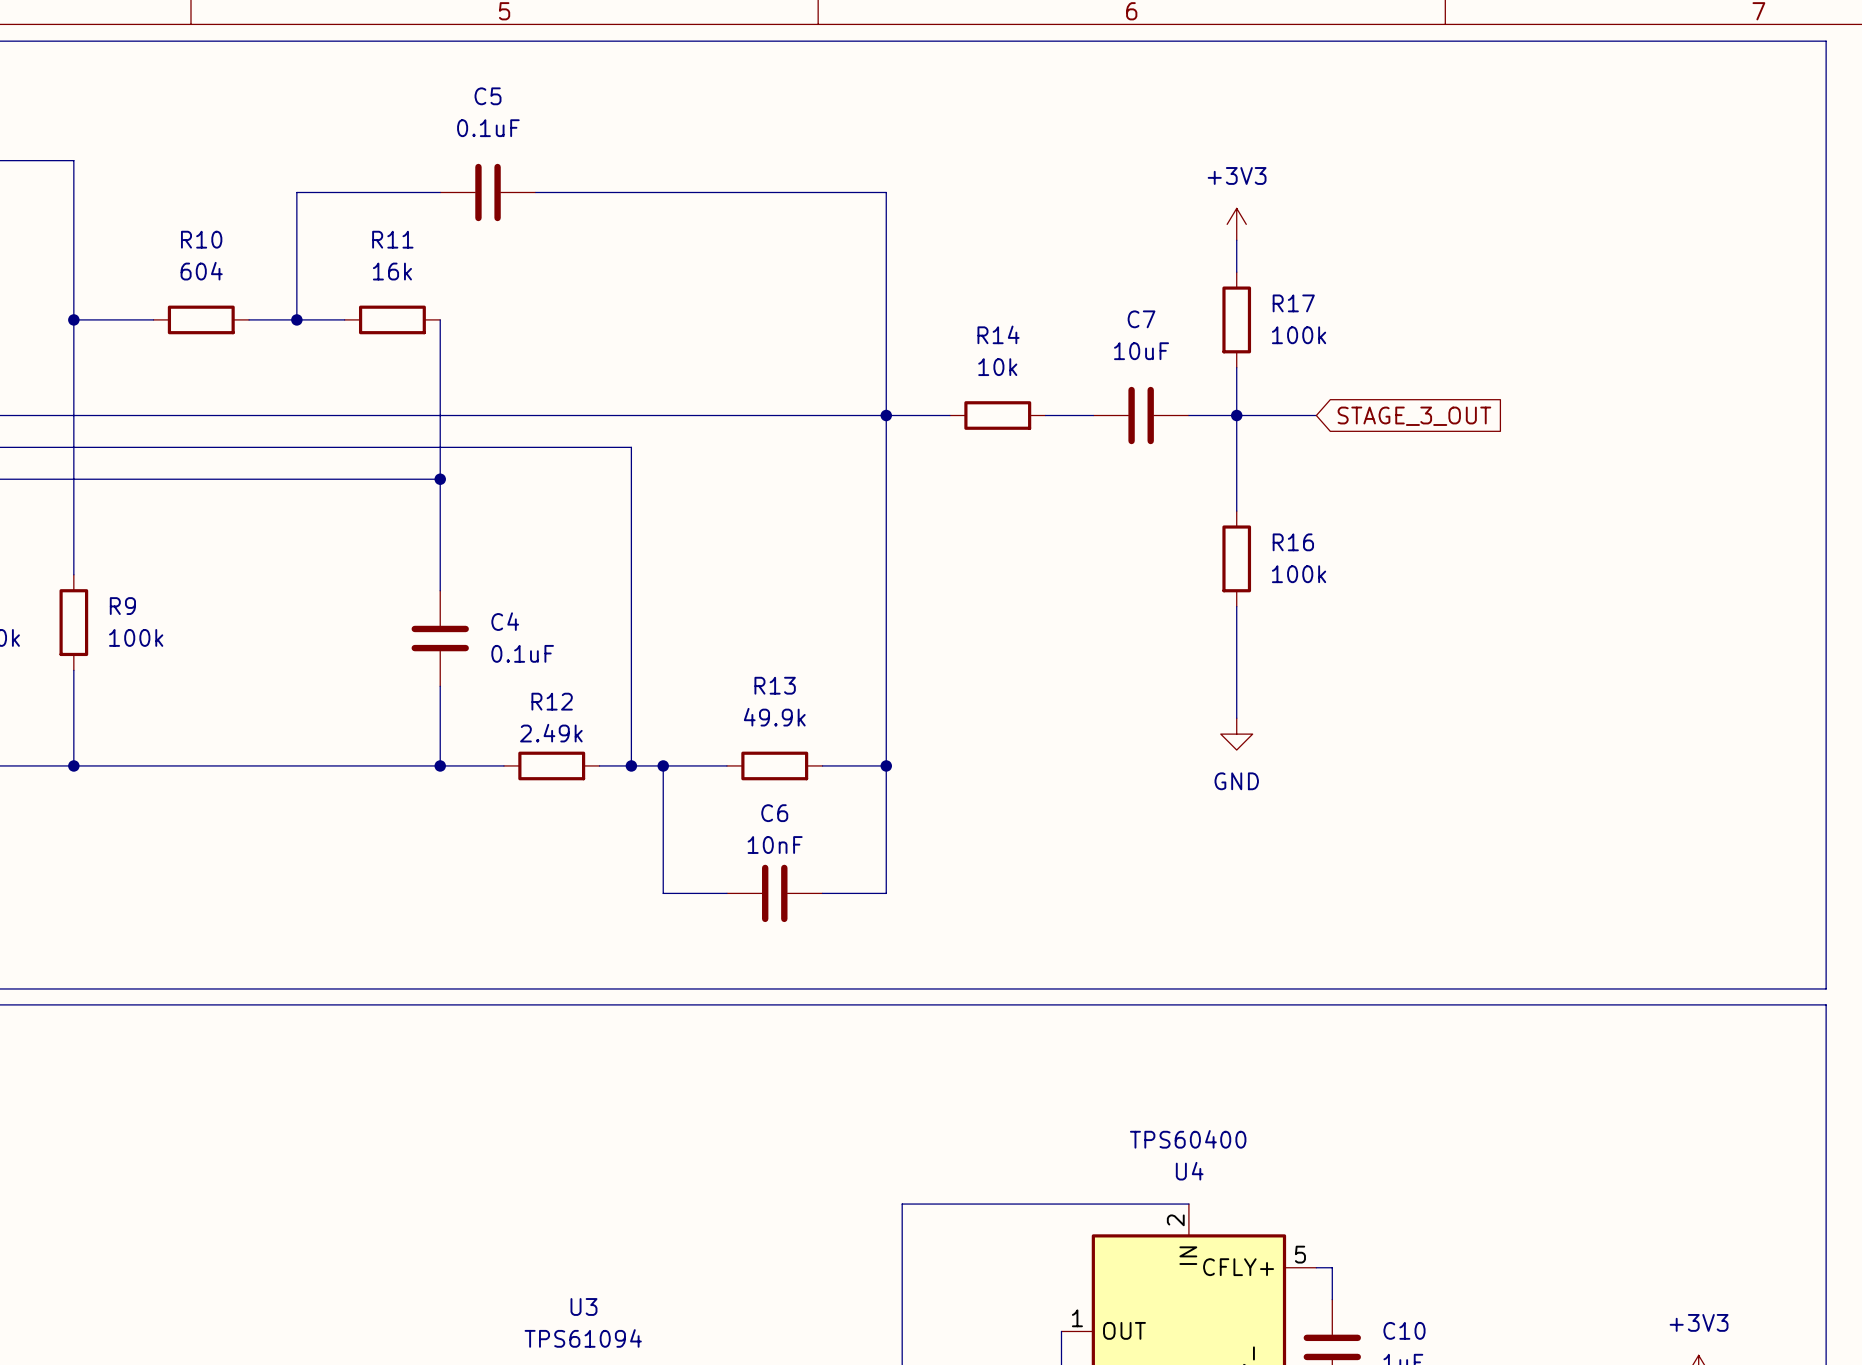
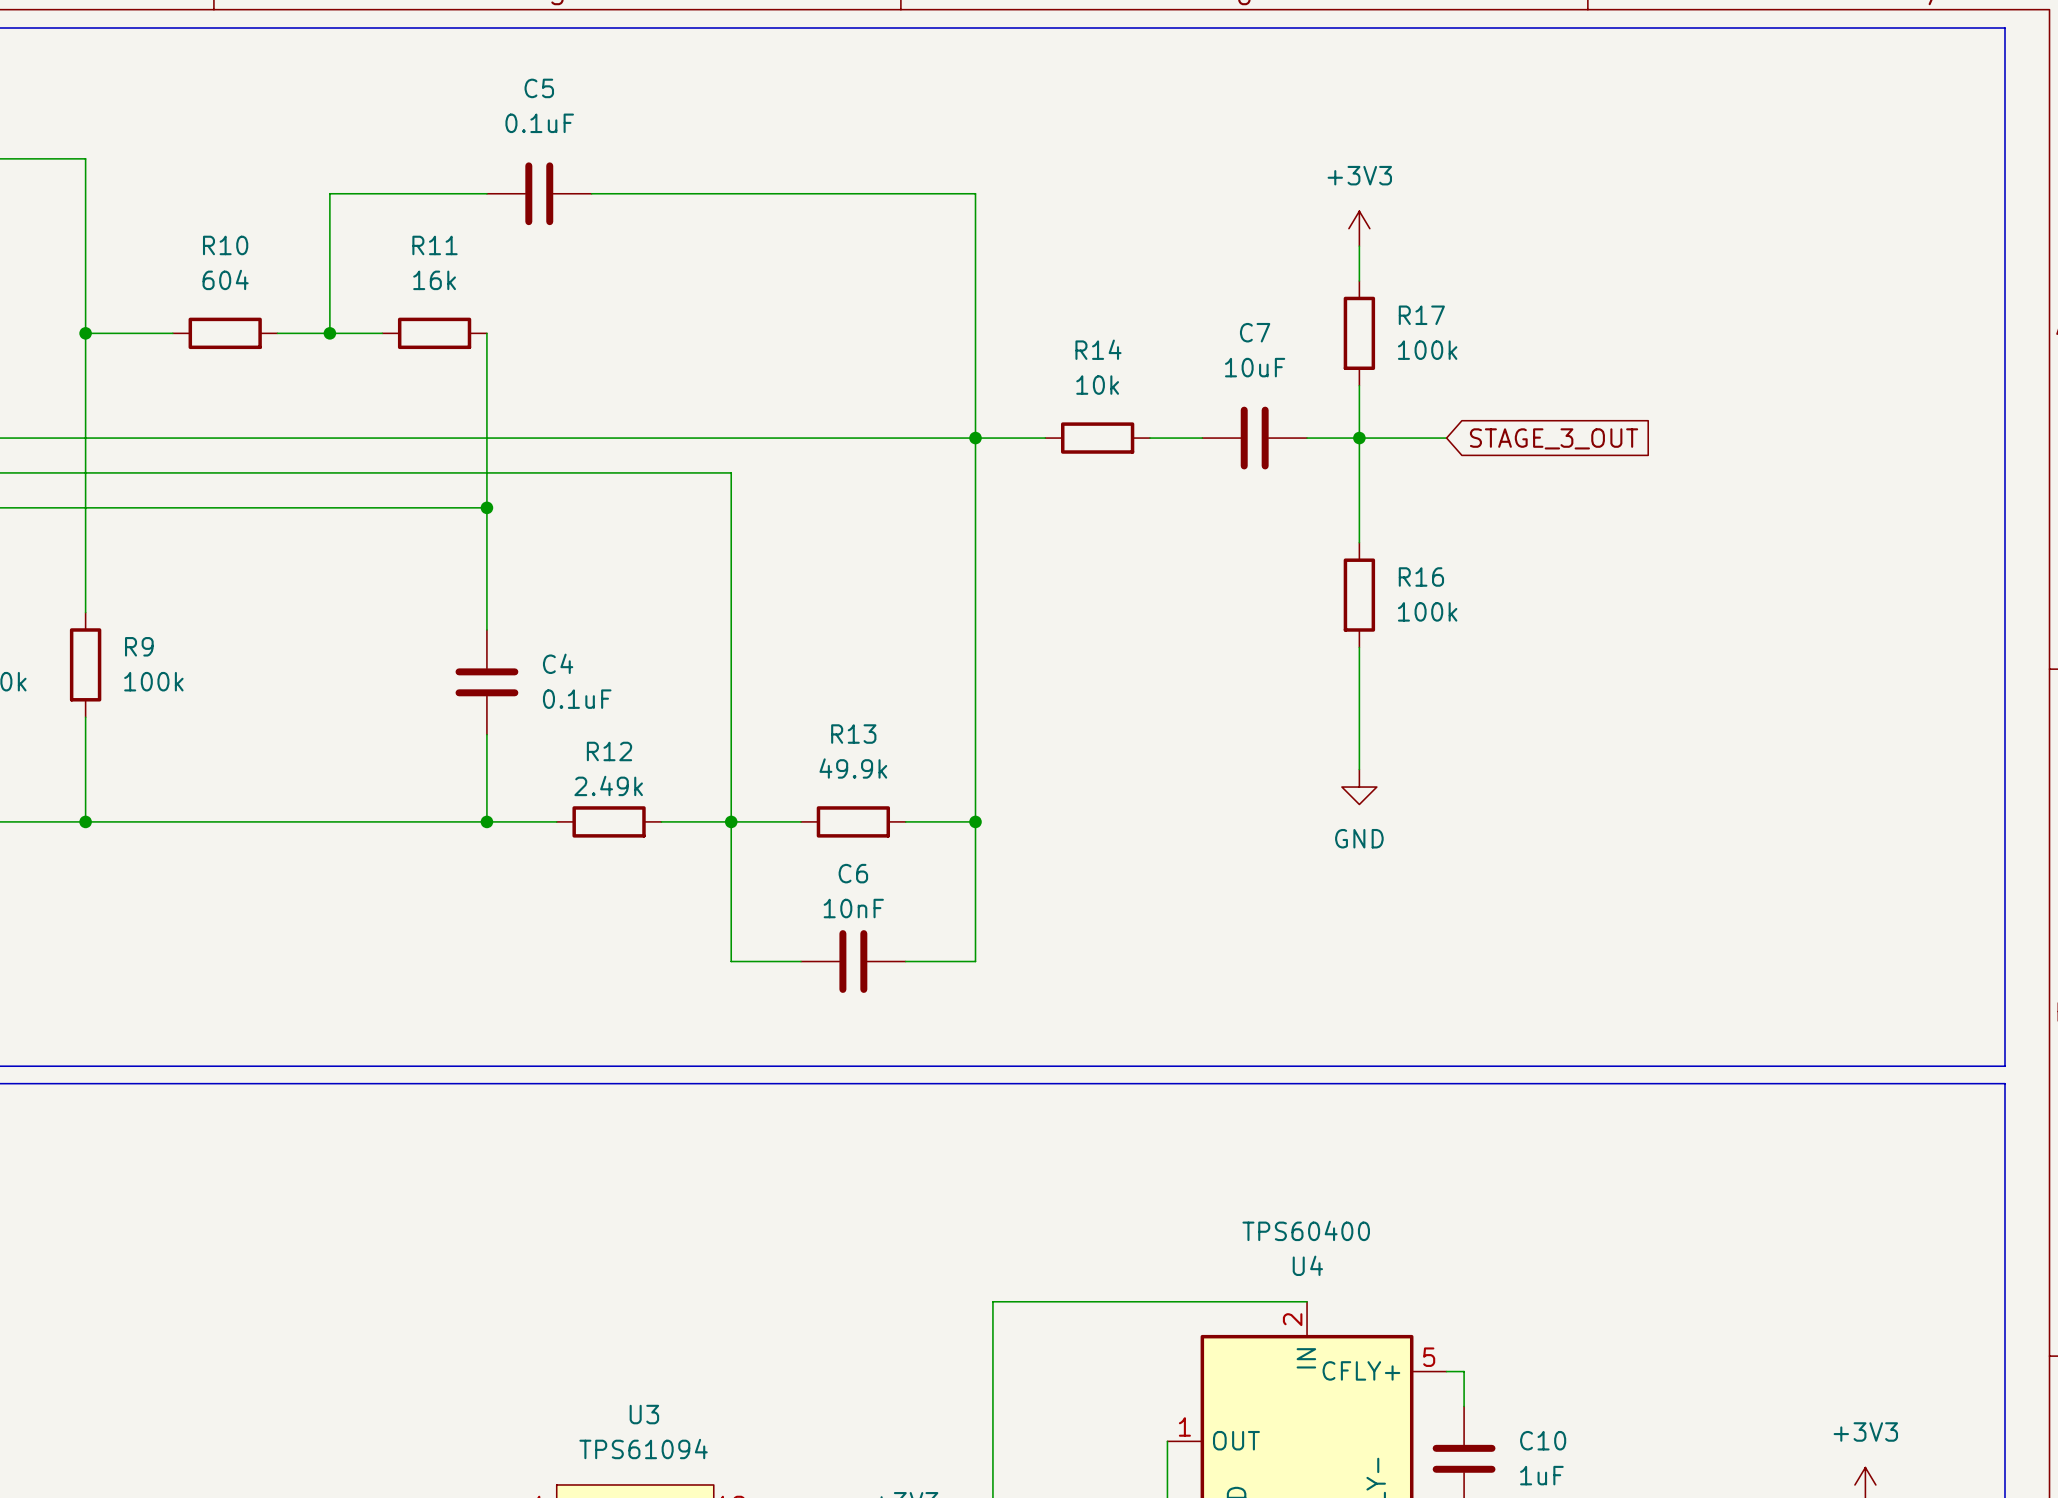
wire: (631, 447) (631, 765) -> (696, 472) (731, 472) (731, 821)
junction: (631, 765) -> none

